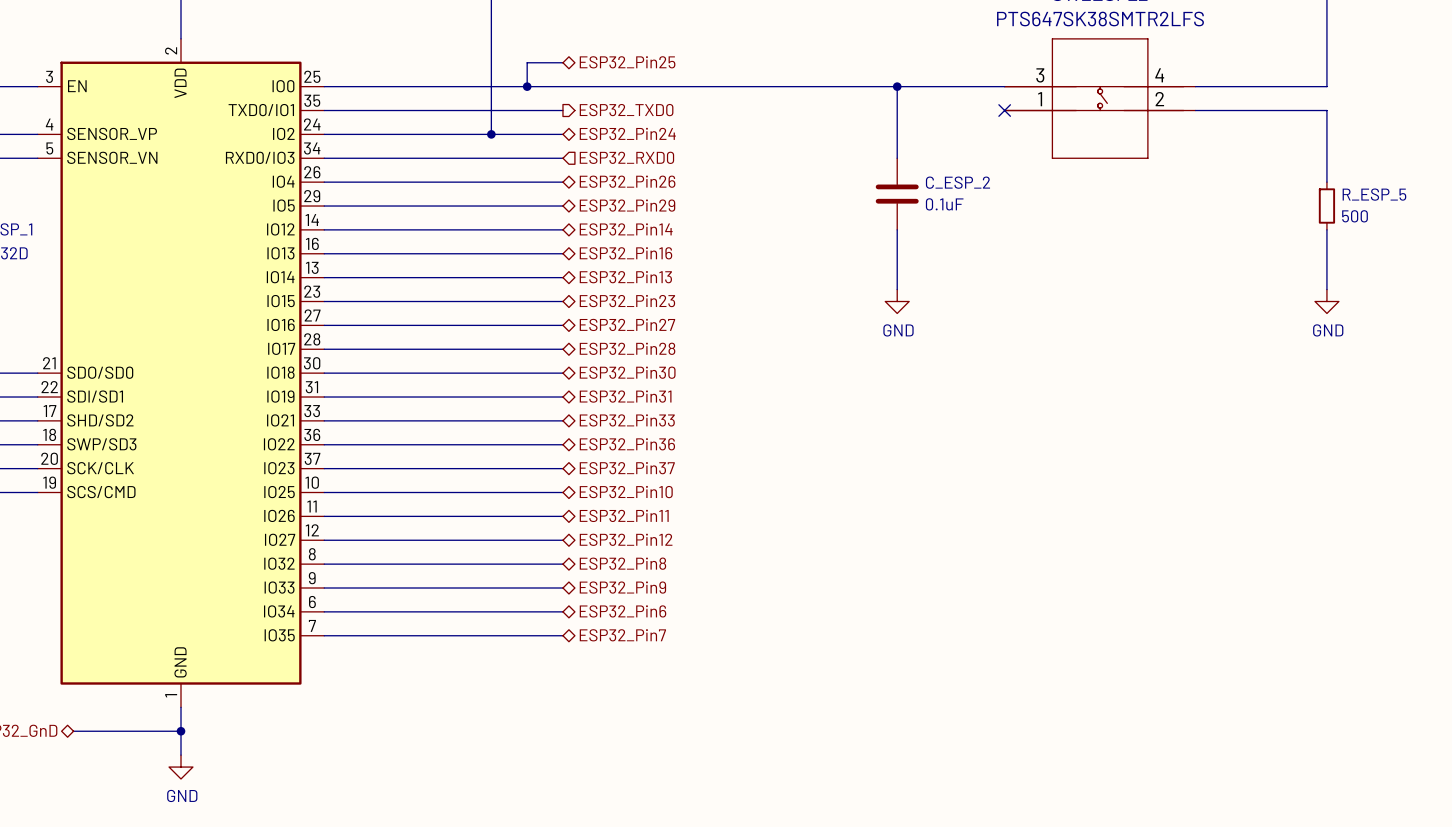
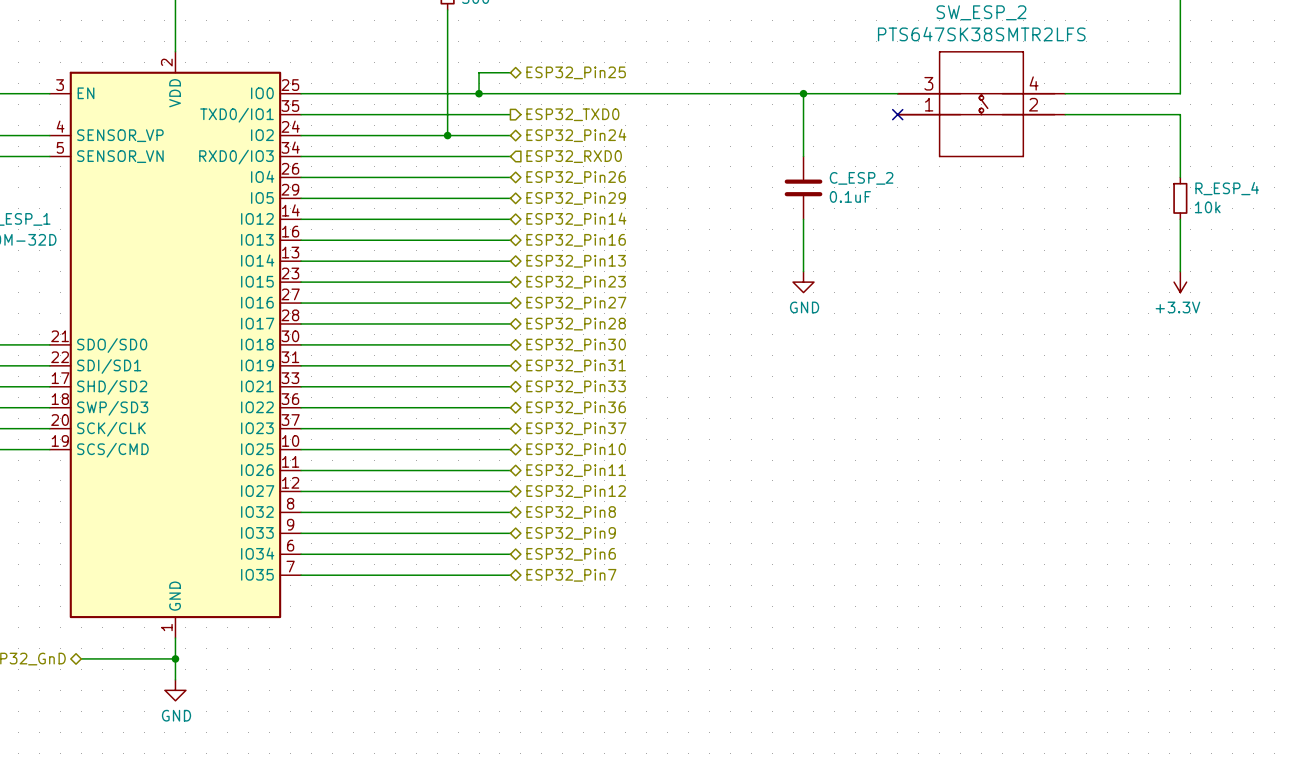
R_ESP_5 name: R_ESP_5 (1374, 194) -> R_ESP_4 (1227, 188)
R_ESP_5 value: 500 (1355, 216) -> 10k (1207, 207)
power symbol: GND (1326, 301) -> +3.3V (1180, 282)

